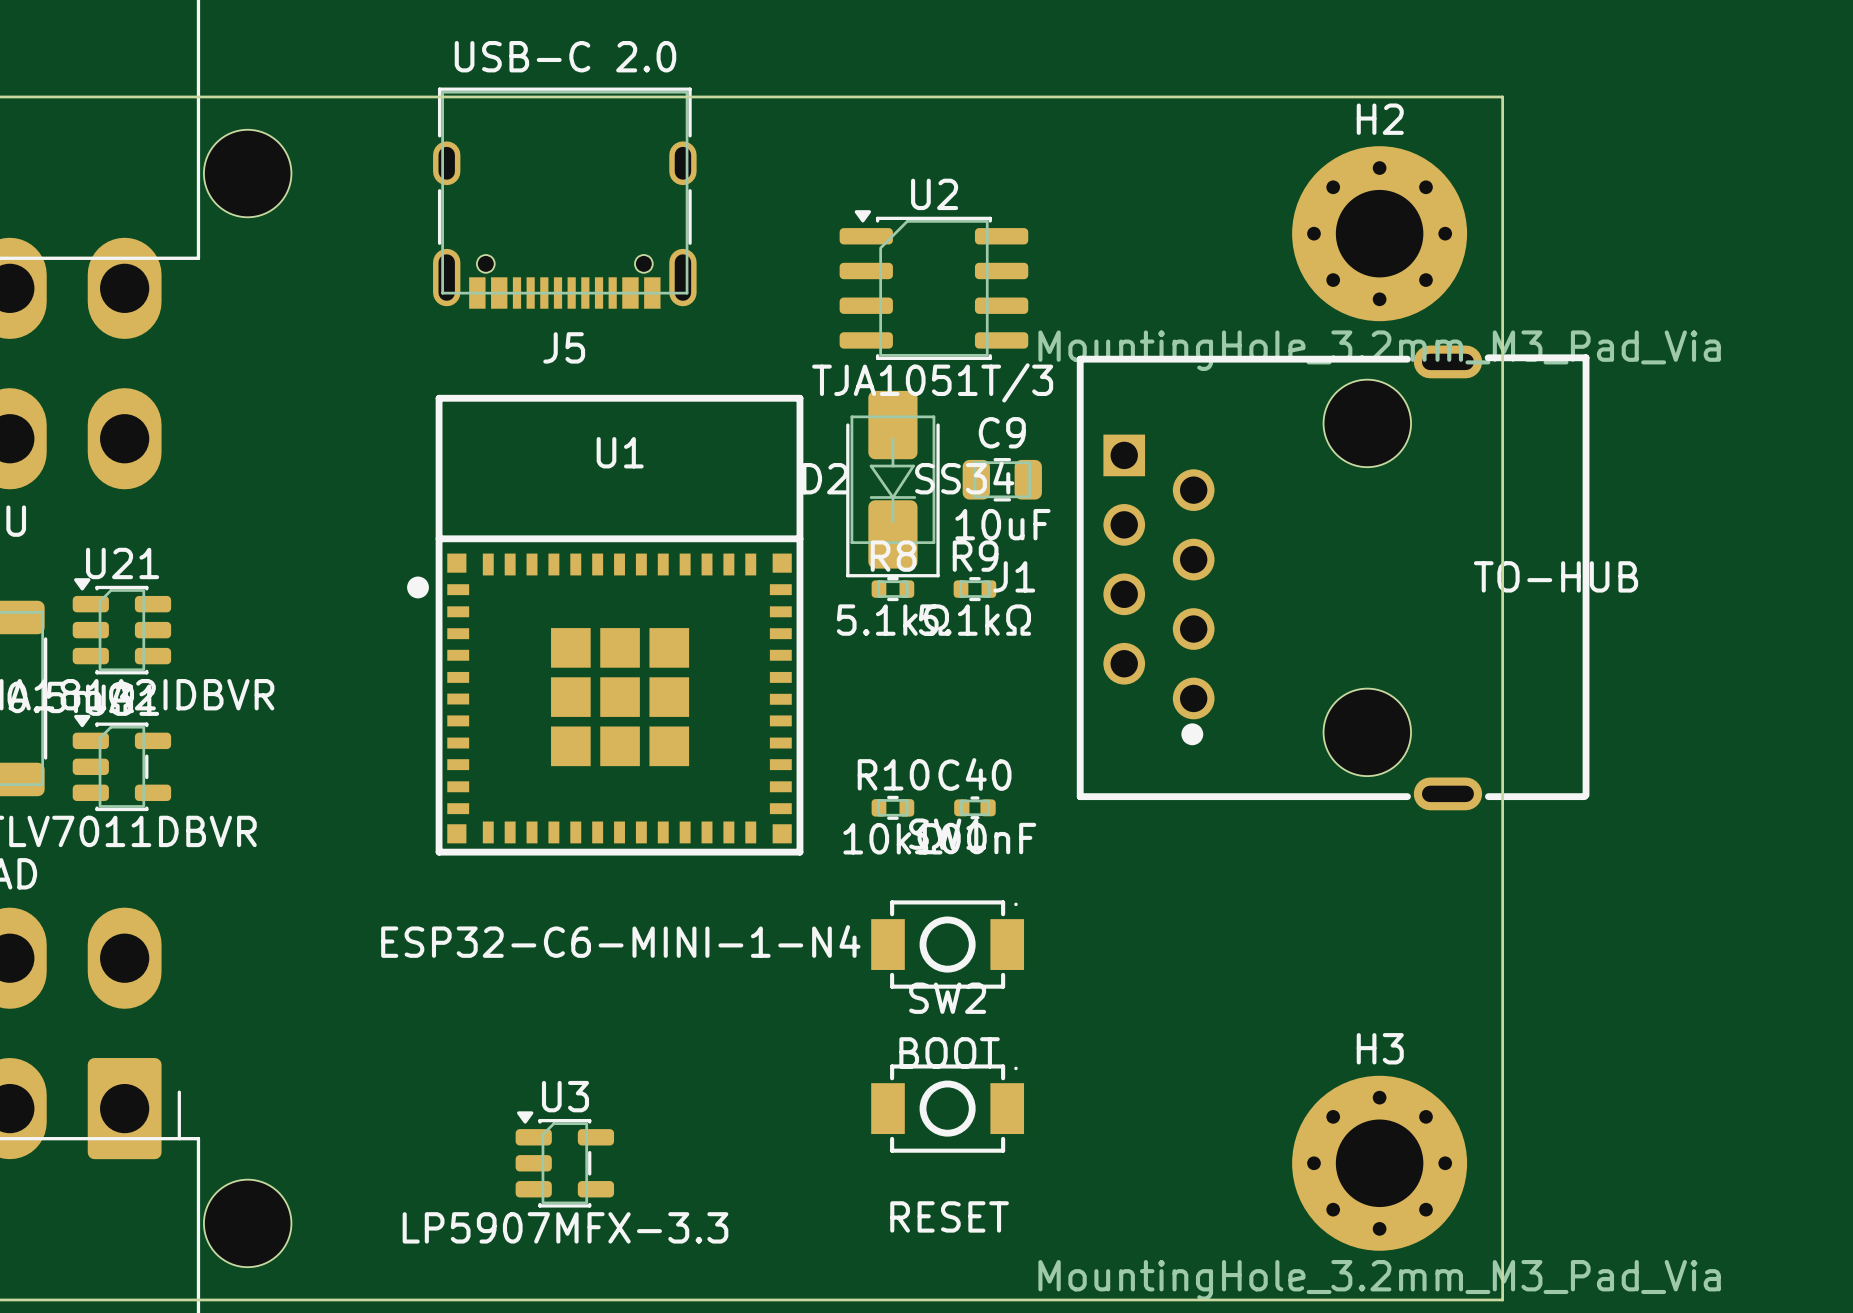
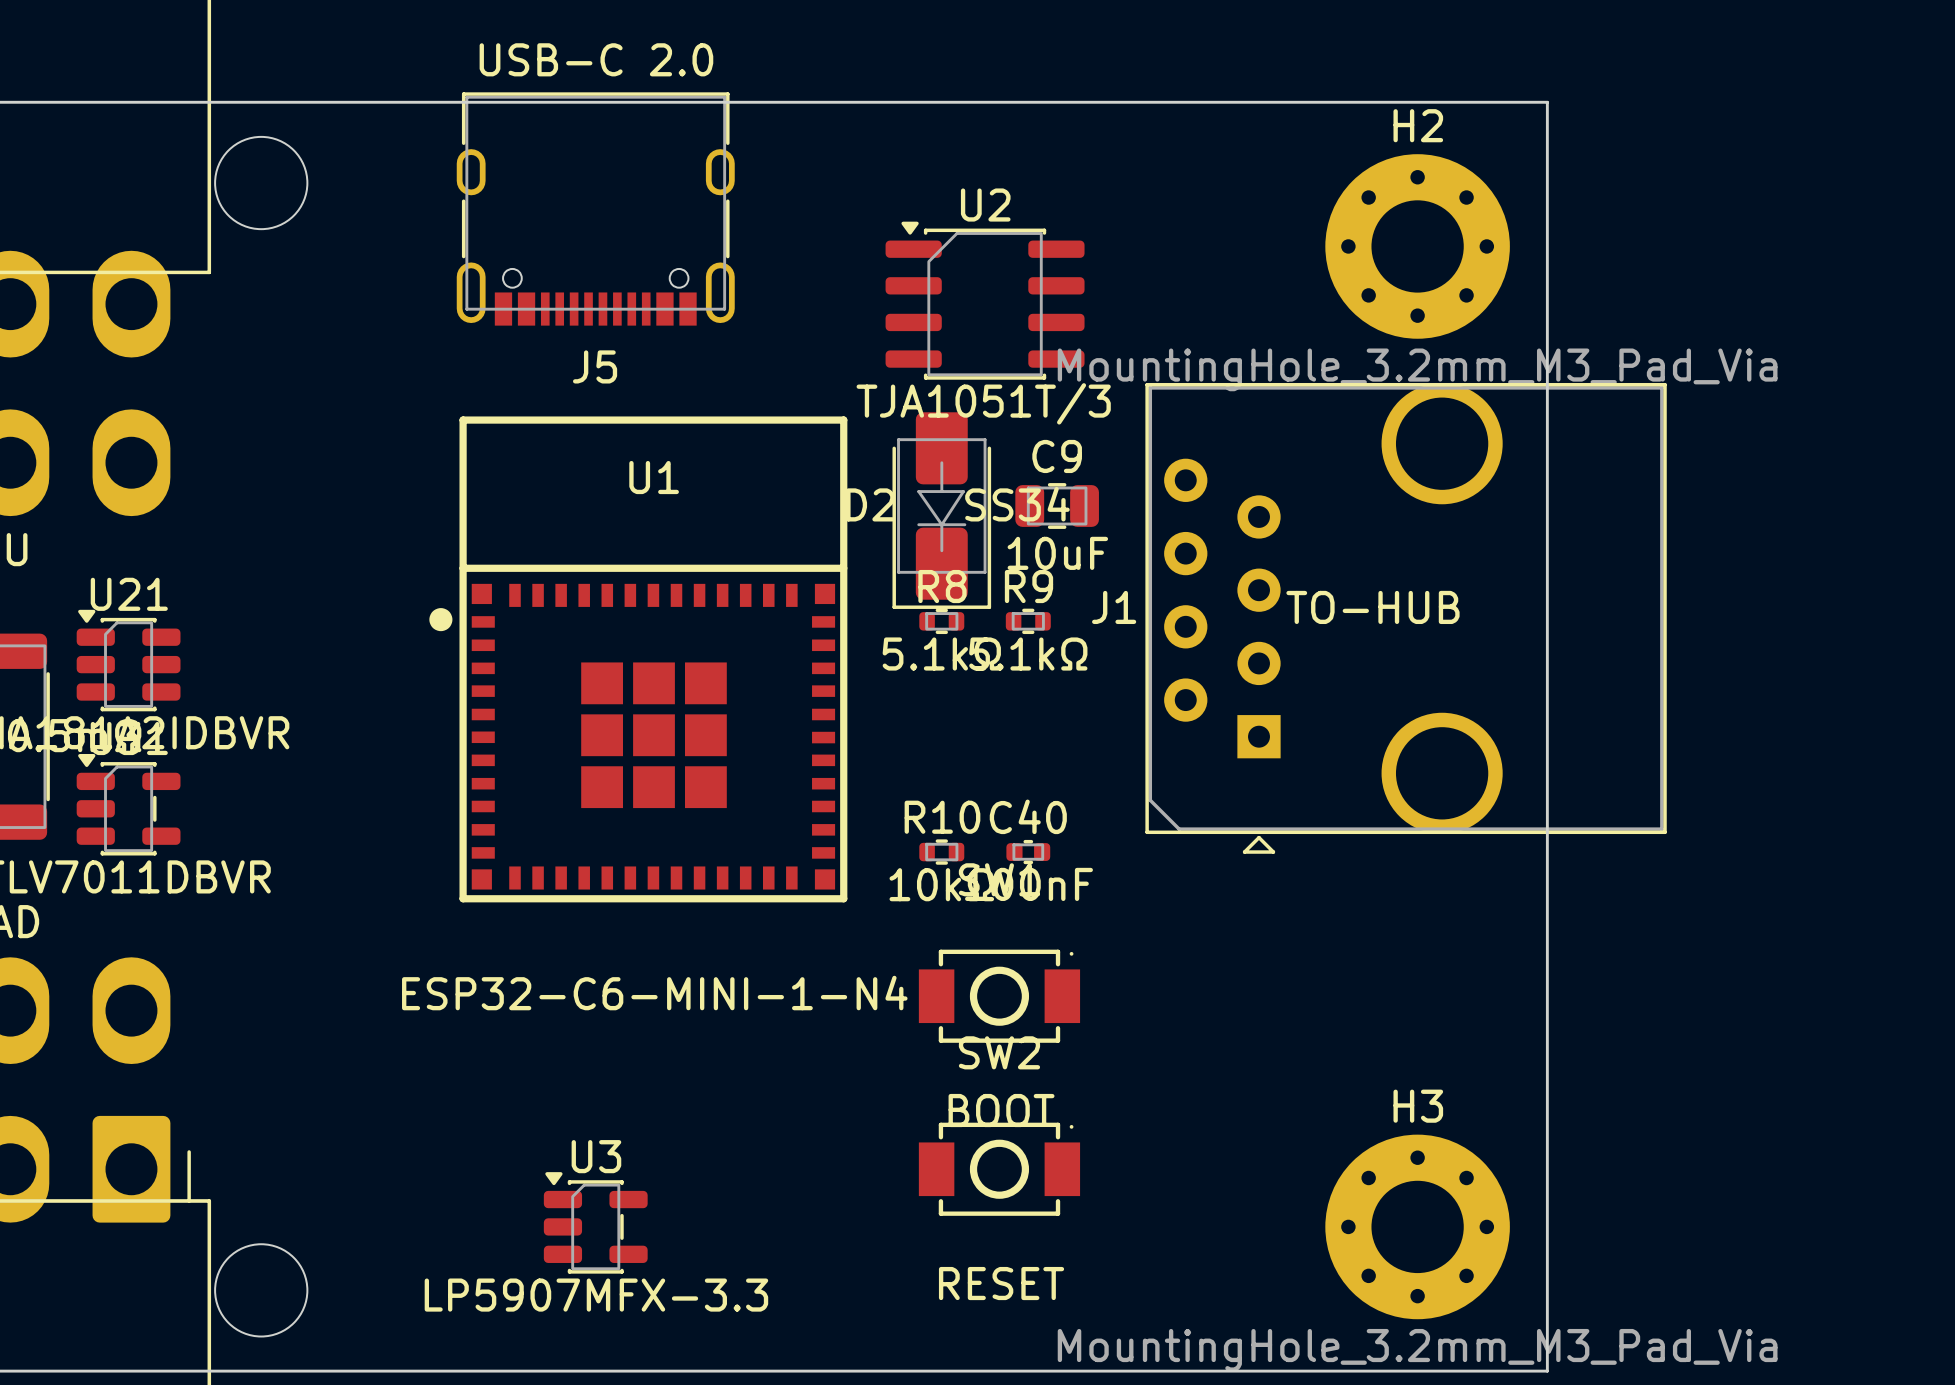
board edge: (1467, 96) (1502, 96) (1502, 1299) (1467, 1299) -> (1547, 102) (1547, 1371)
H2 position: (1379, 233) -> (1417, 246)
J1 footprint: [1076, 345, 1590, 811] -> [1145, 383, 1667, 854]
J1 value position: TO-HUB (1556, 576) -> TO-HUB (1372, 607)
H3 position: (1379, 1163) -> (1417, 1226)

